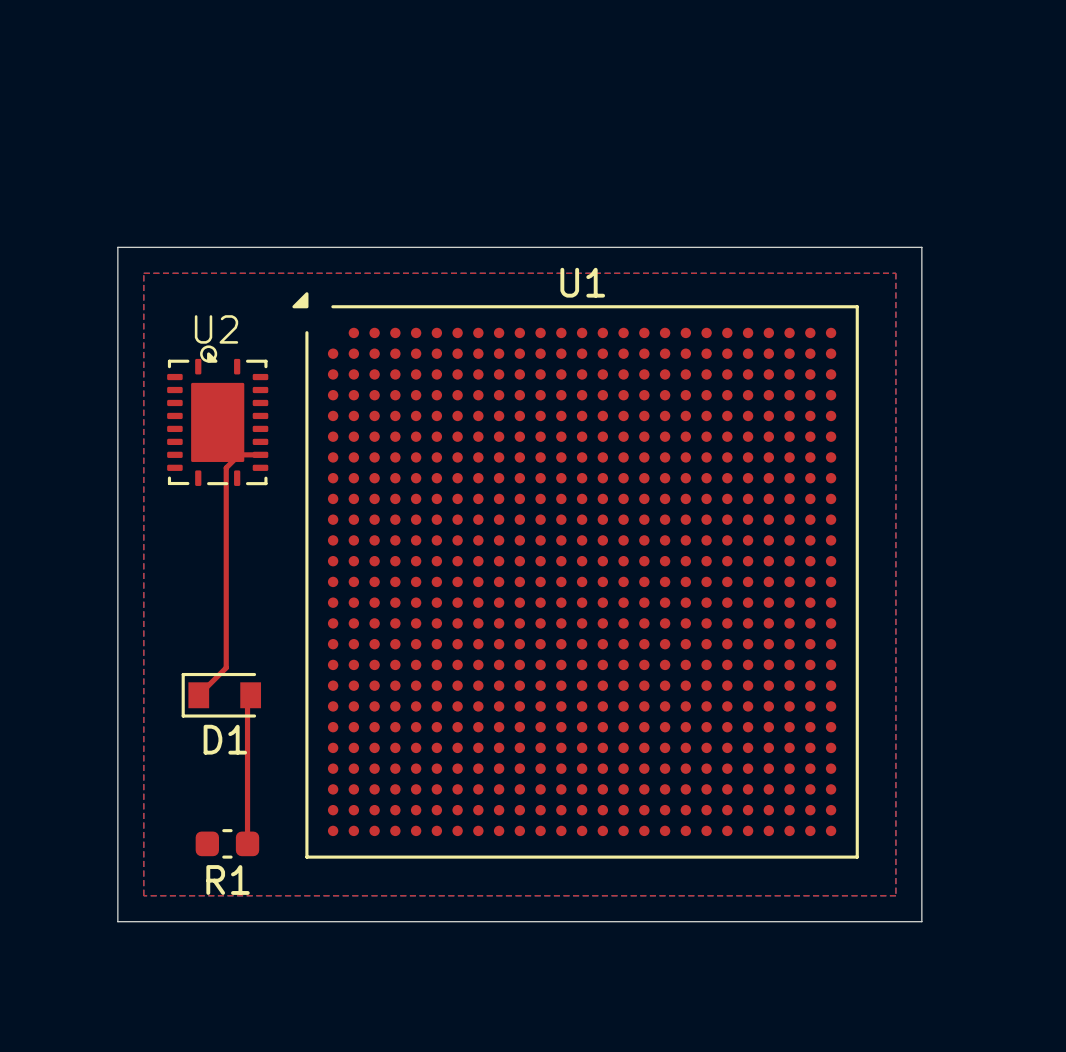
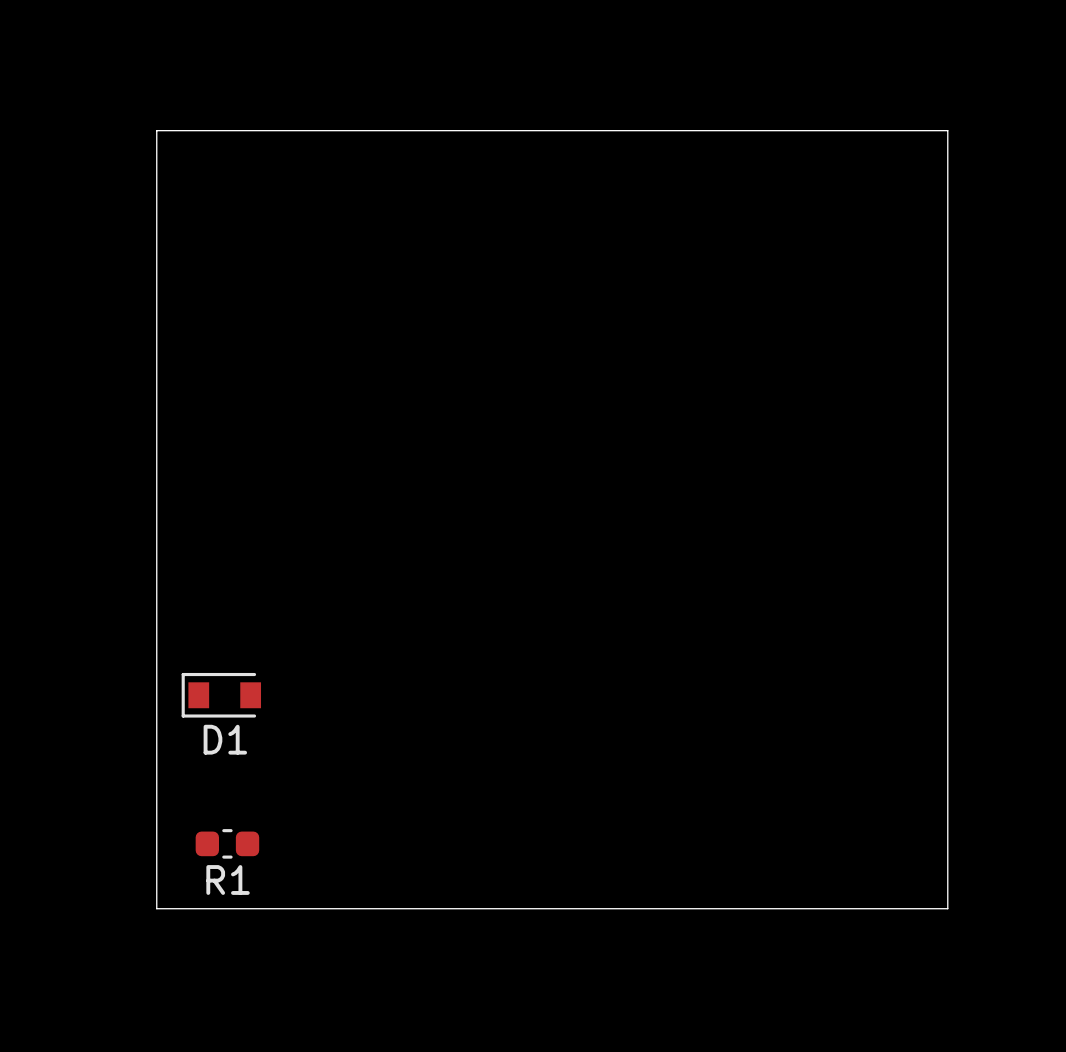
board edge: (117, 247) (921, 247) (921, 921) (117, 921) (117, 247) -> (156, 130) (156, 908) (947, 908) (947, 130) (156, 130)
top zone outline: (143, 273) (895, 273) (895, 895) (143, 895) (143, 273) -> none
U2: (217, 415) -> none
top track: (260, 454) (239, 454) (226, 467) (226, 667) (198, 695) -> none
U1: (575, 575) -> none
top track: (250, 695) (247, 698) (247, 843) -> none

